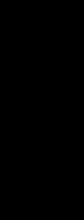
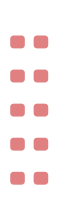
part: none -> (29, 41)
part: none -> (29, 76)
part: none -> (29, 110)
part: none -> (29, 144)
part: none -> (29, 178)

